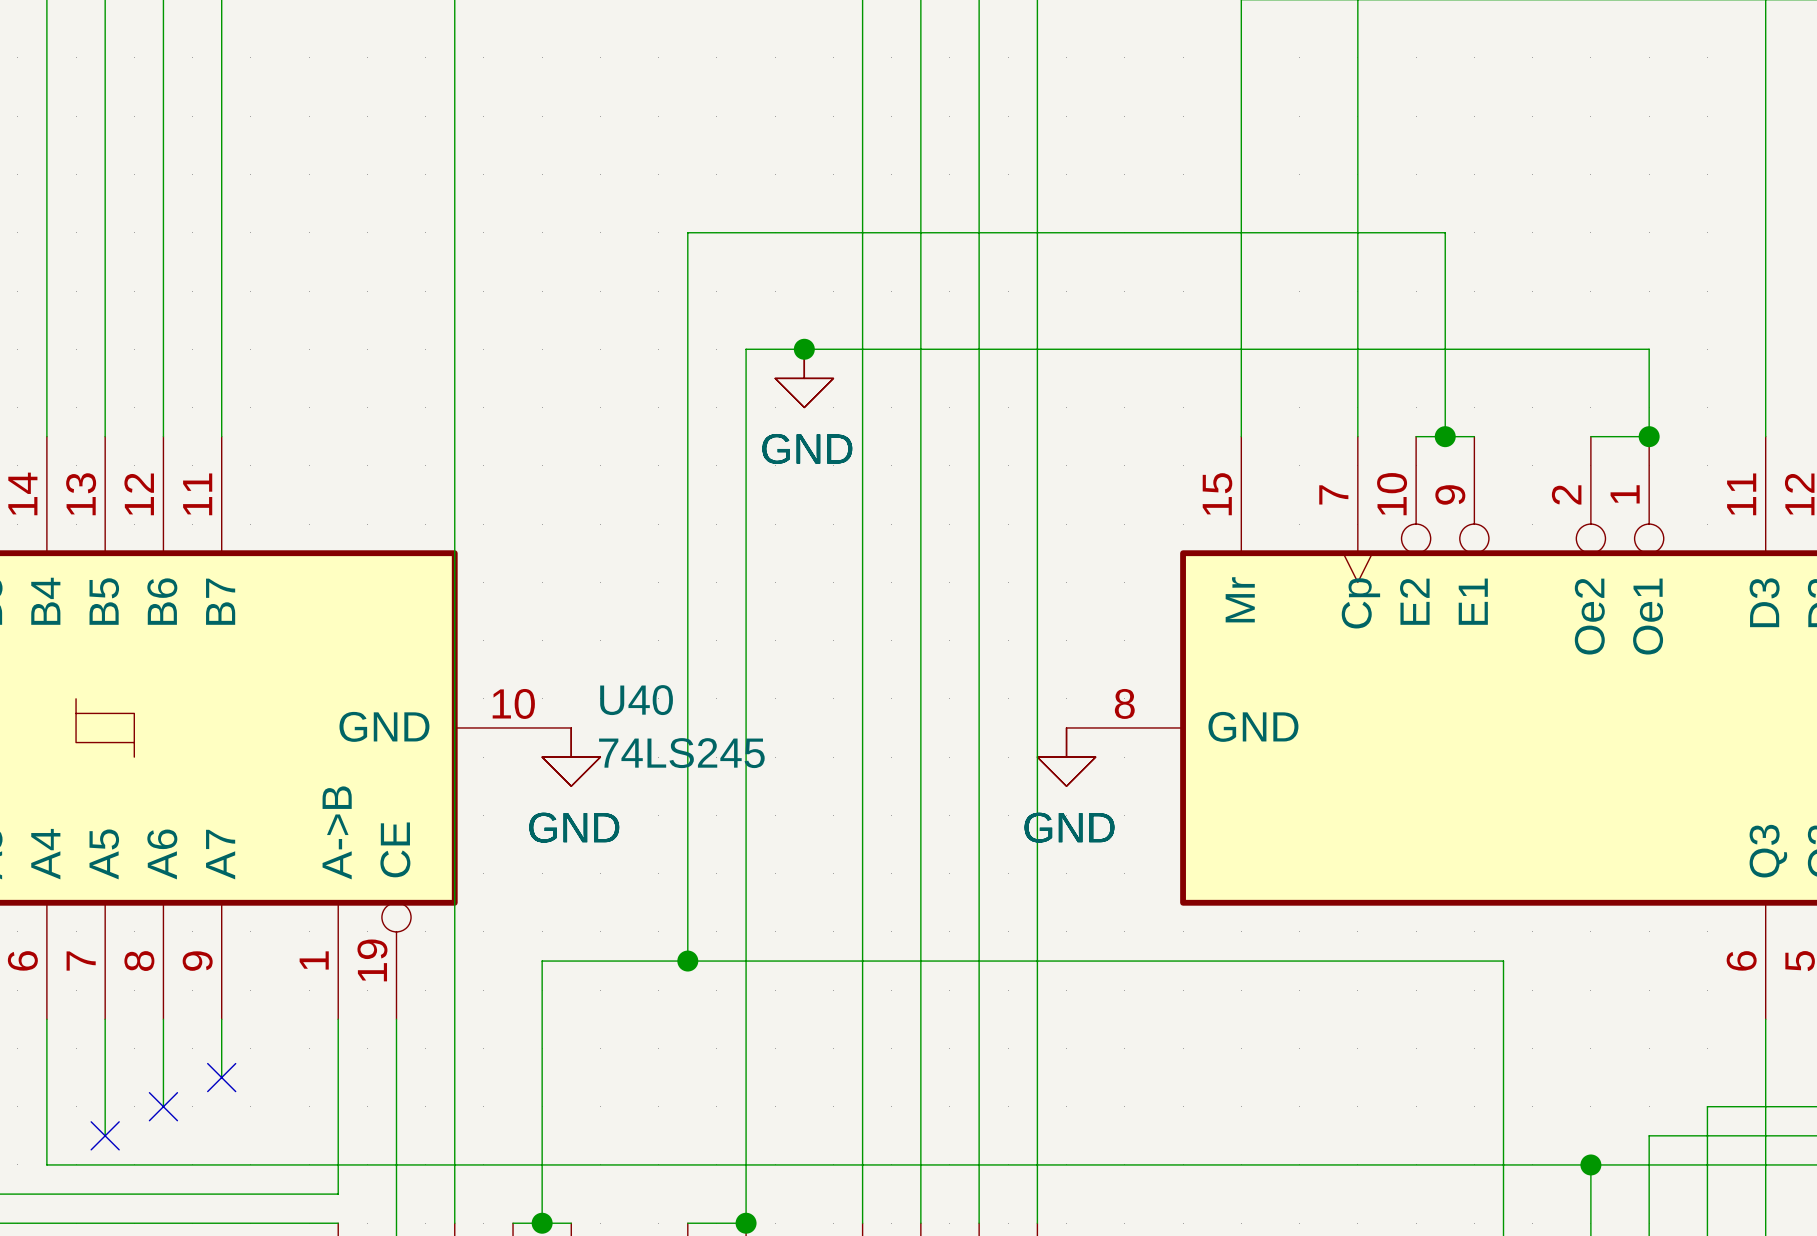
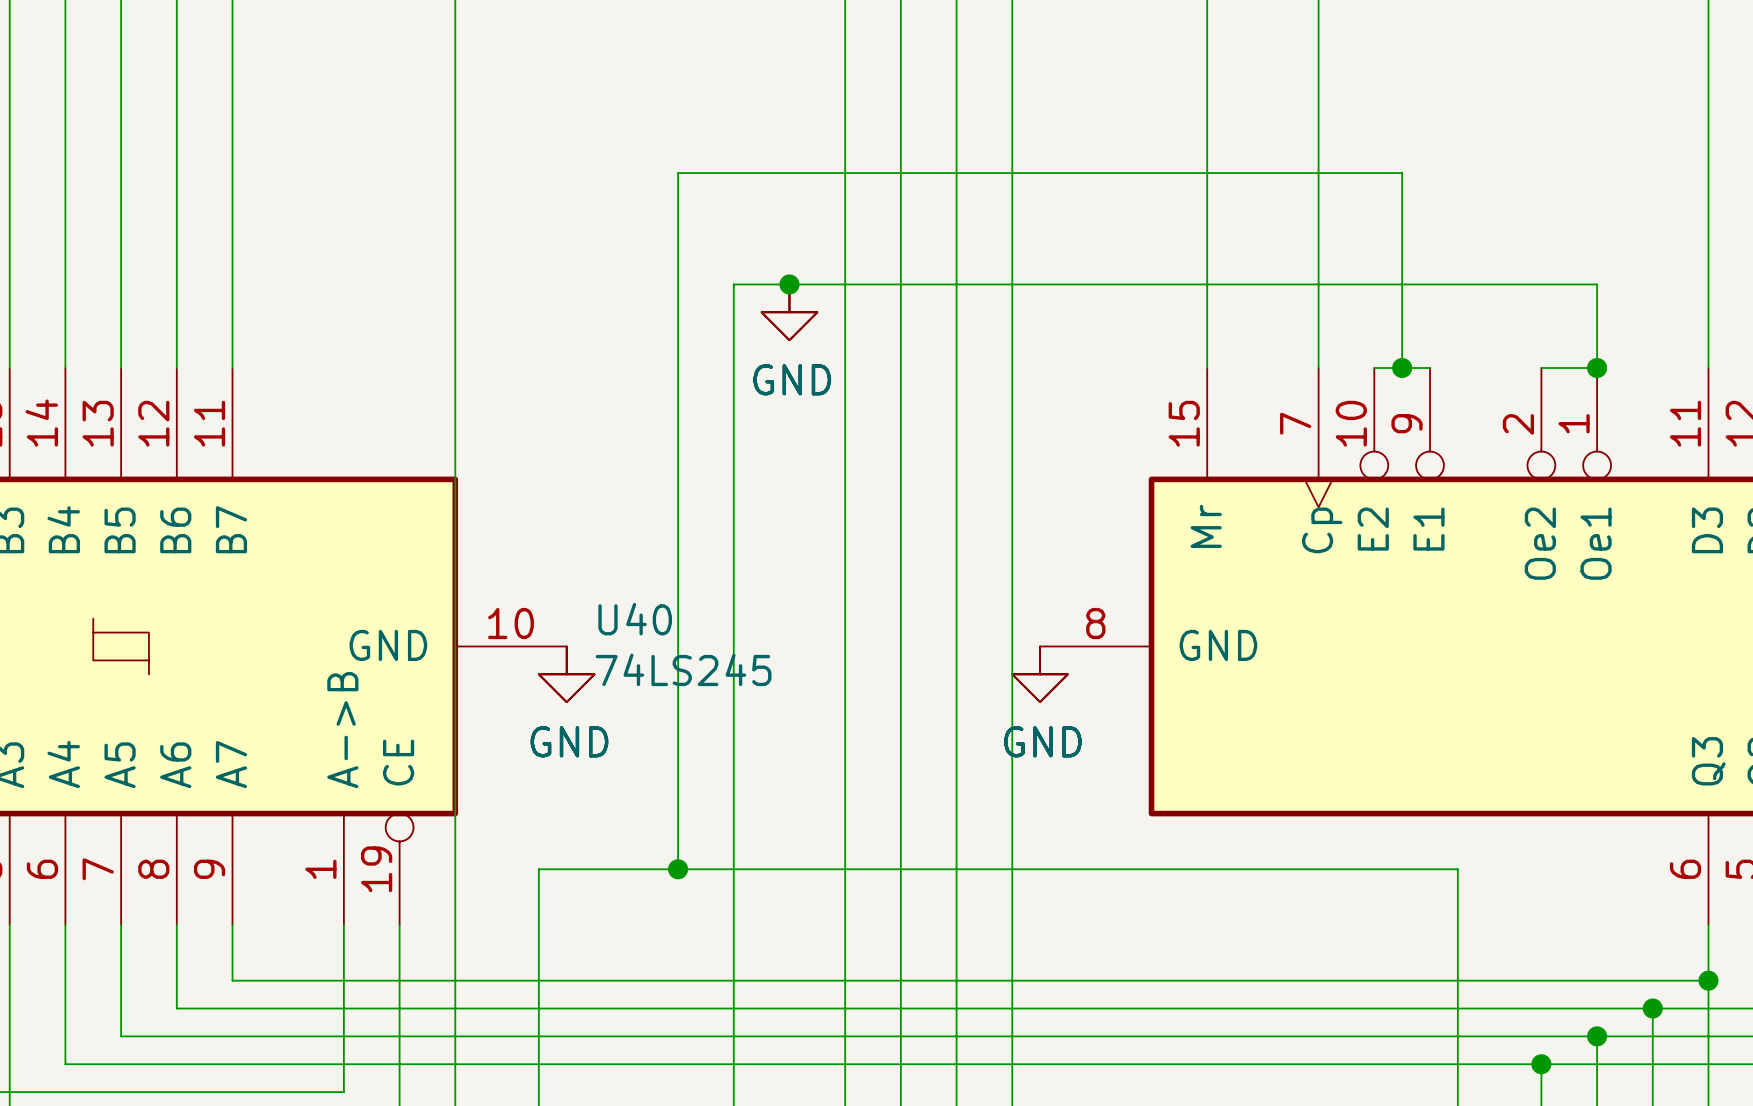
wire: none -> (232, 980) (1708, 980)
no-connect mark: (221, 1077) -> none
junction: none -> (1708, 980)
wire: none -> (176, 1008) (1652, 1008)
no-connect mark: (163, 1106) -> none
junction: none -> (1652, 1008)
wire: none -> (121, 1036) (1597, 1036)
no-connect mark: (105, 1135) -> none
junction: none -> (1597, 1036)

